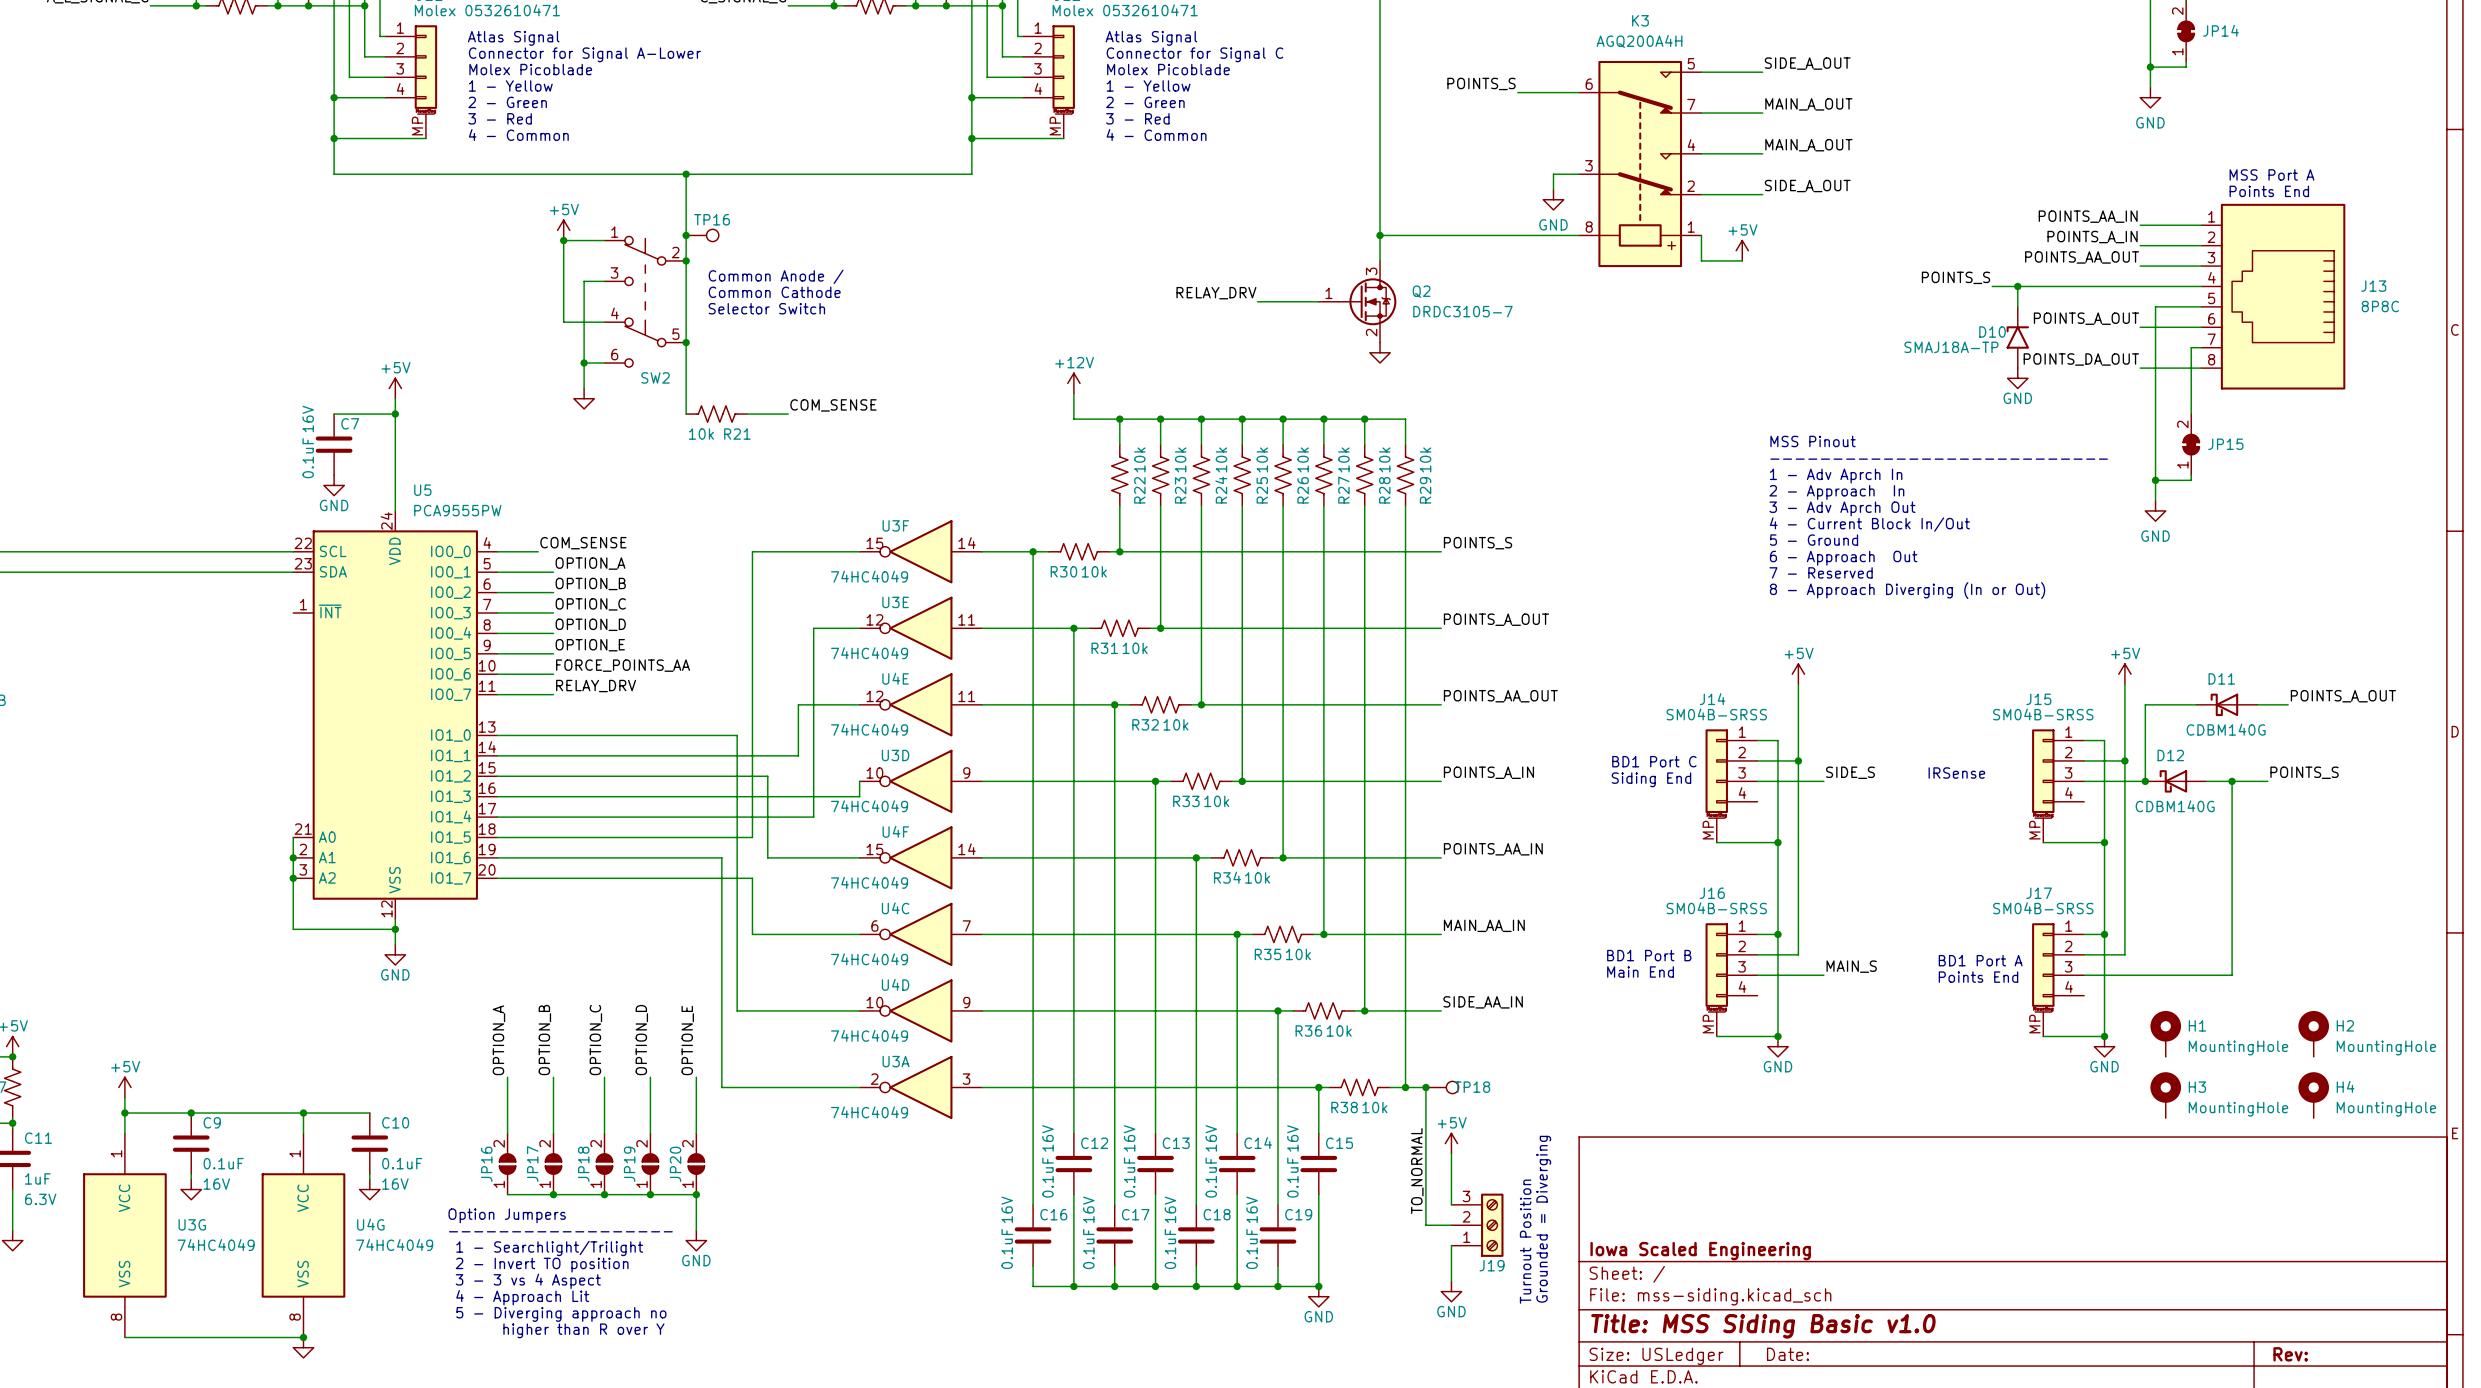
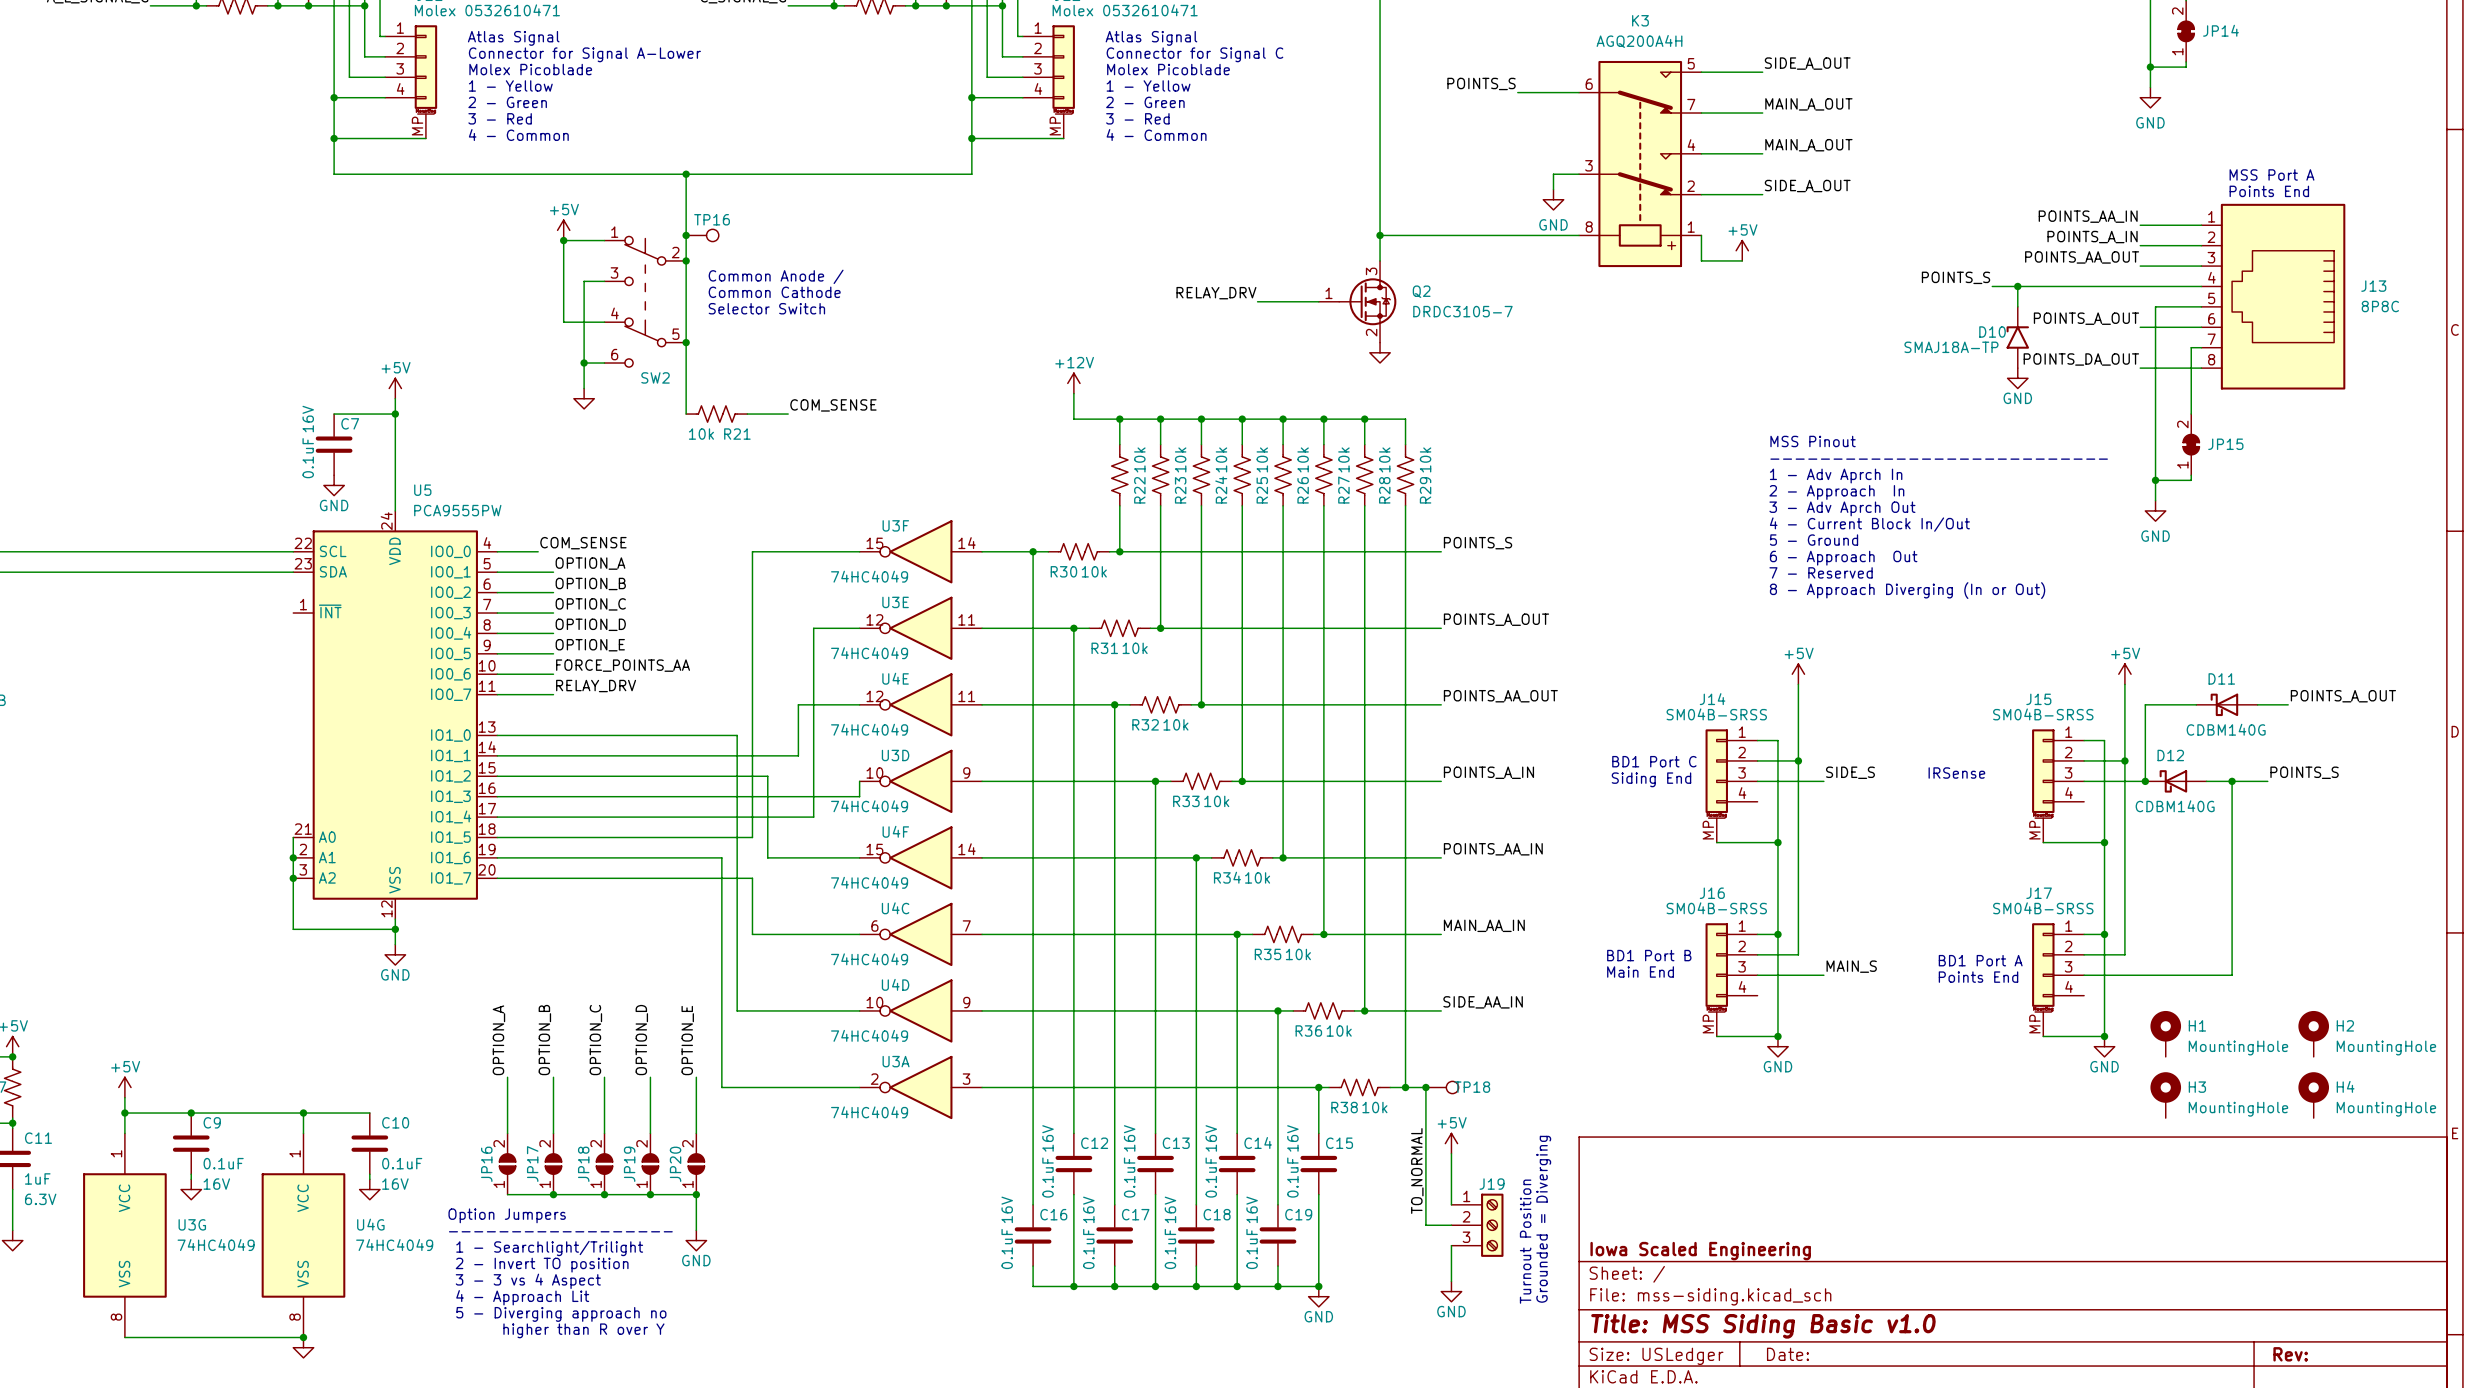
J19 flip: as is (1492, 1225) -> up-down (1492, 1225)

